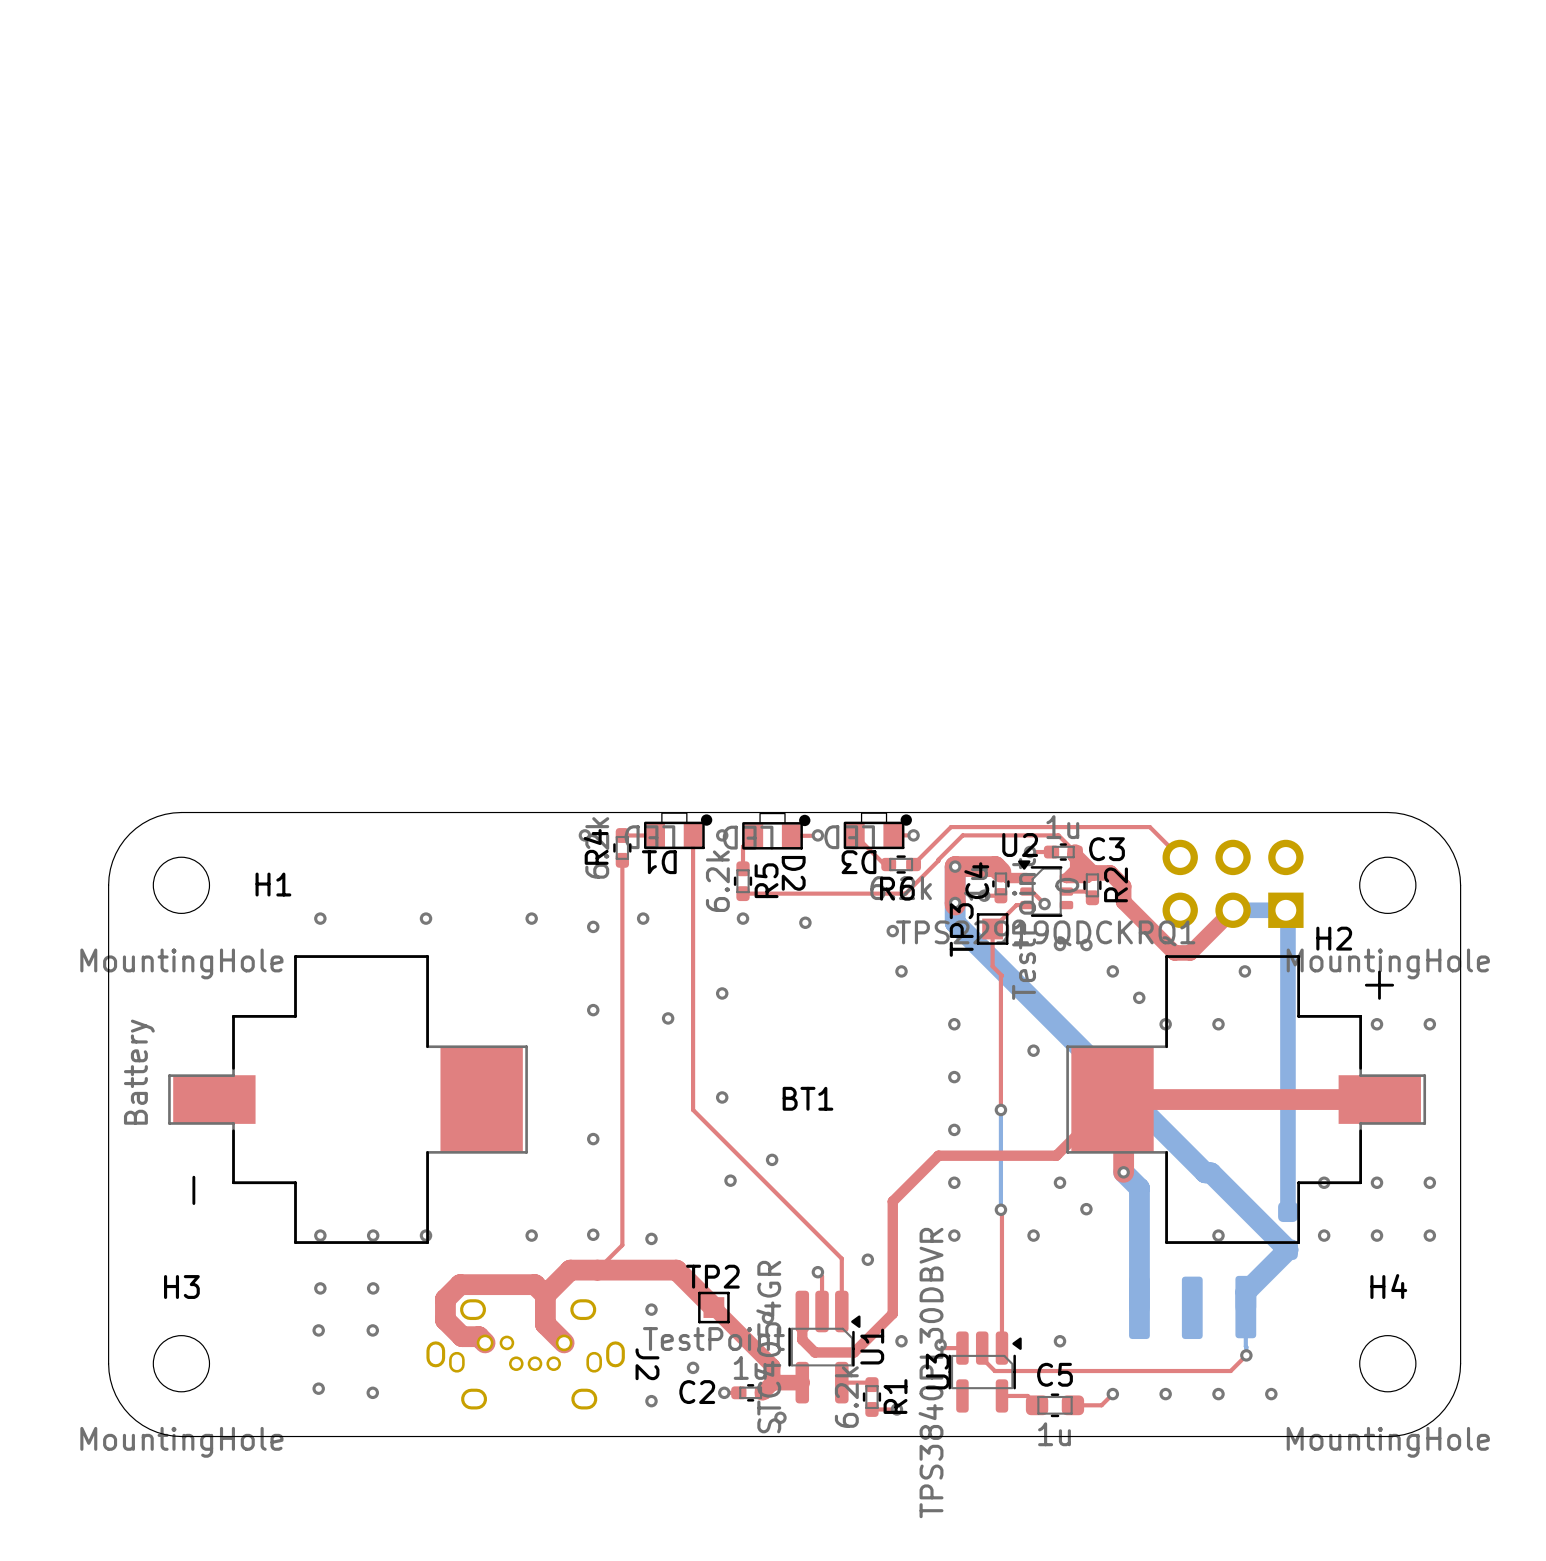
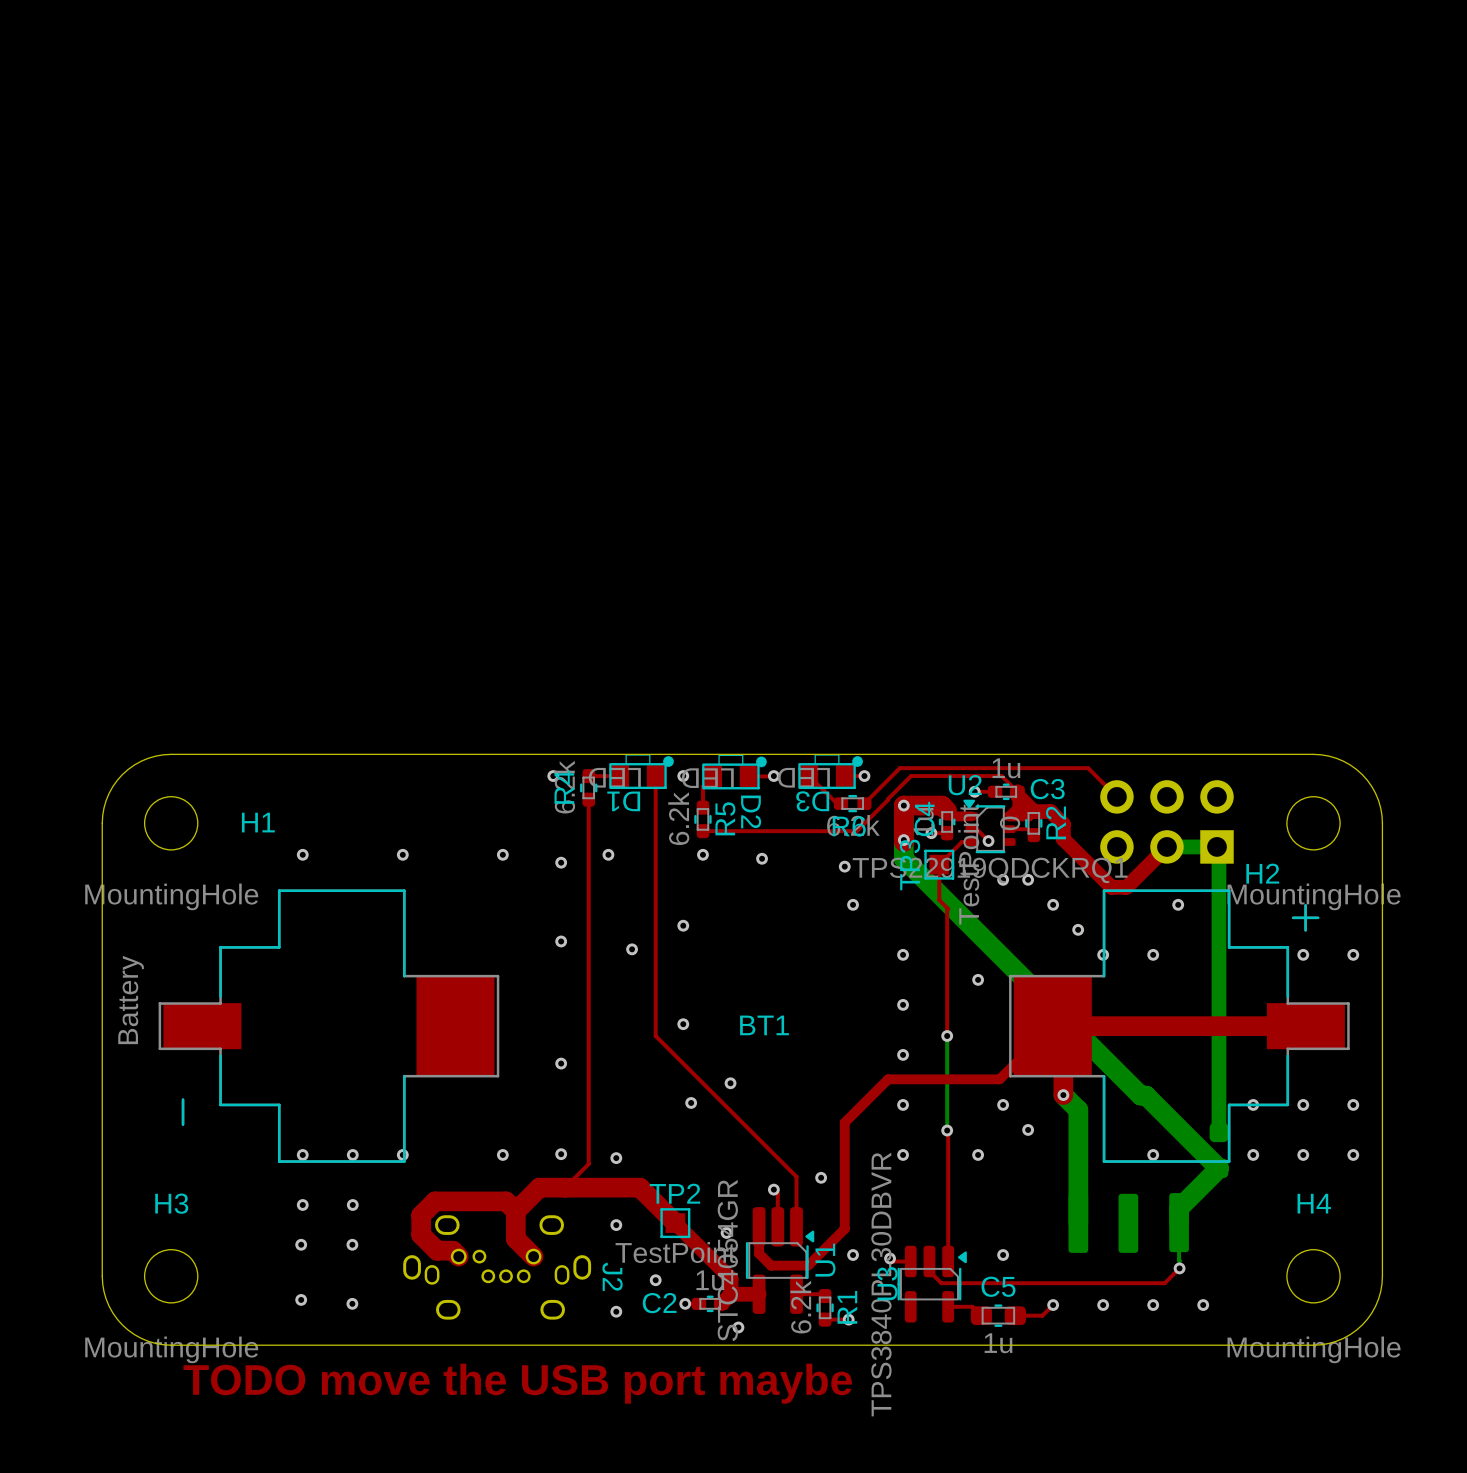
text: none -> TODO move the USB port maybe (517, 1383)

